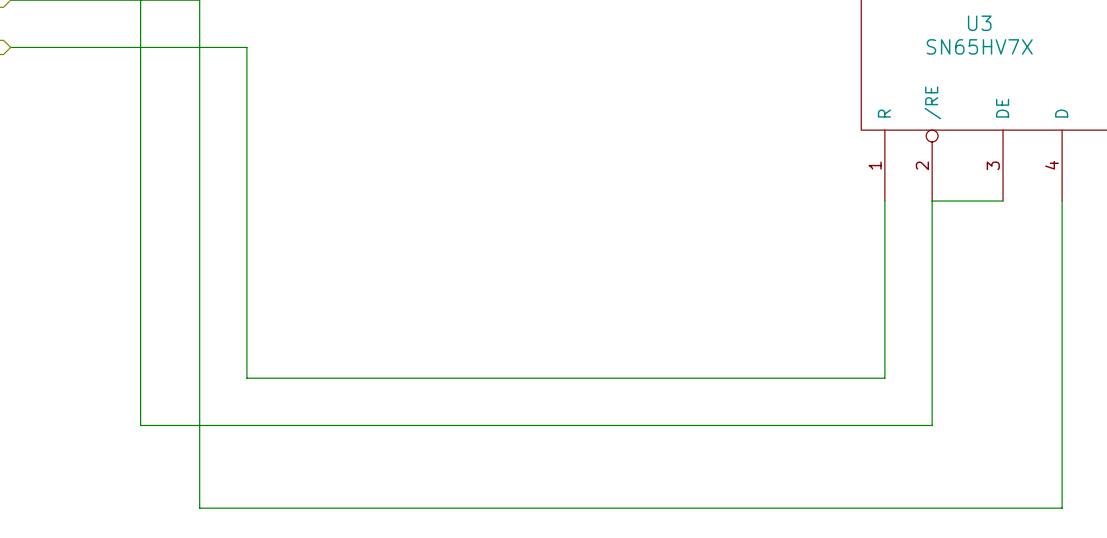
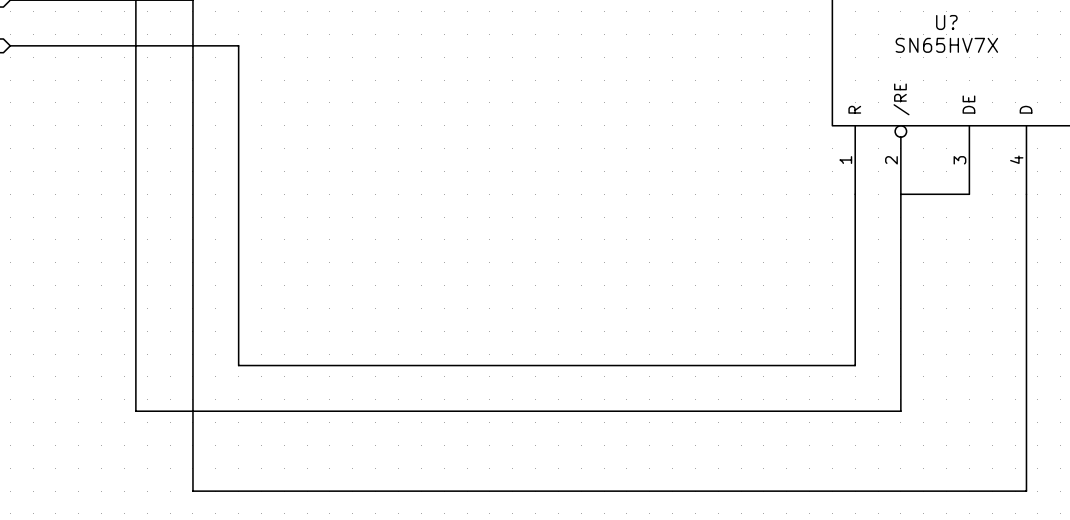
U3 name: U3 (979, 23) -> U? (946, 22)

